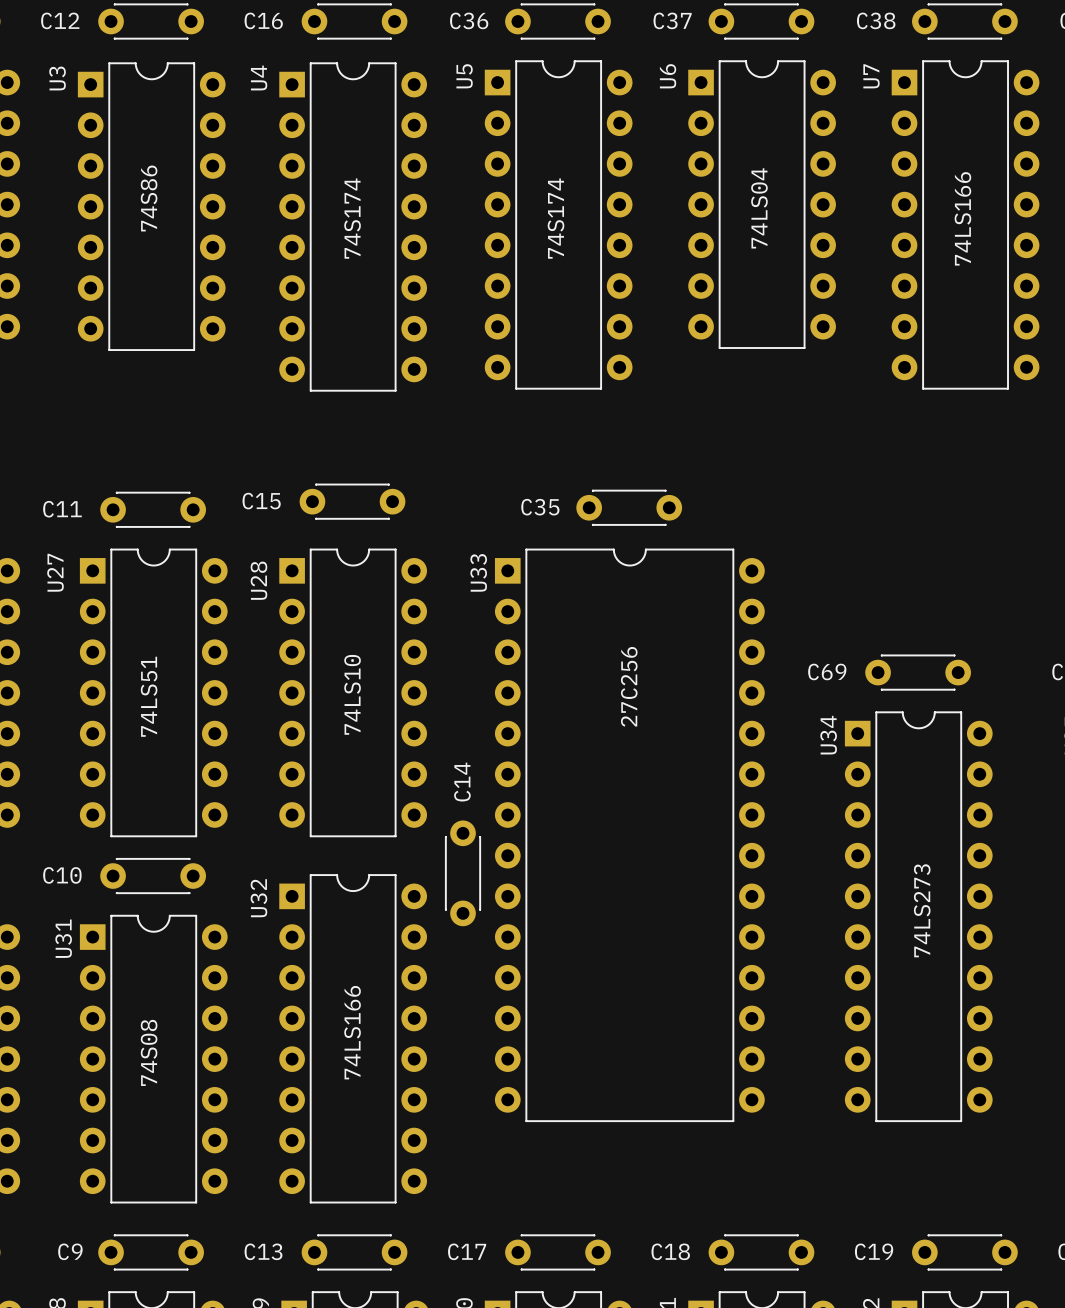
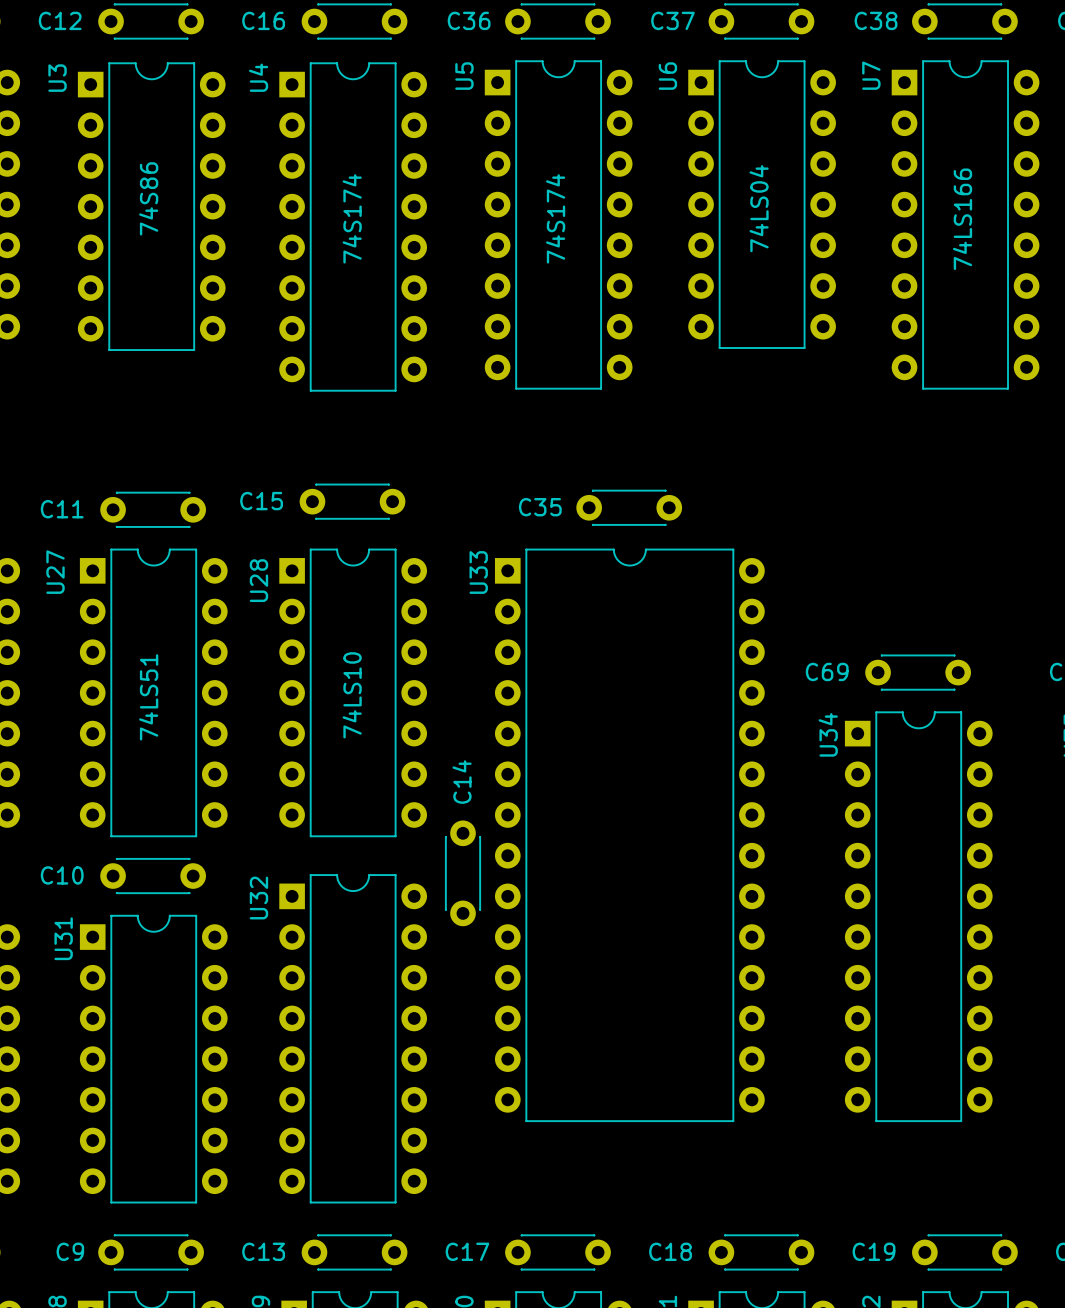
U33 value: 27C256 (629, 686) -> none
U34 value: 74LS273 (922, 910) -> none
U32 value: 74LS166 (352, 1032) -> none
U31 value: 74S08 (149, 1052) -> none

